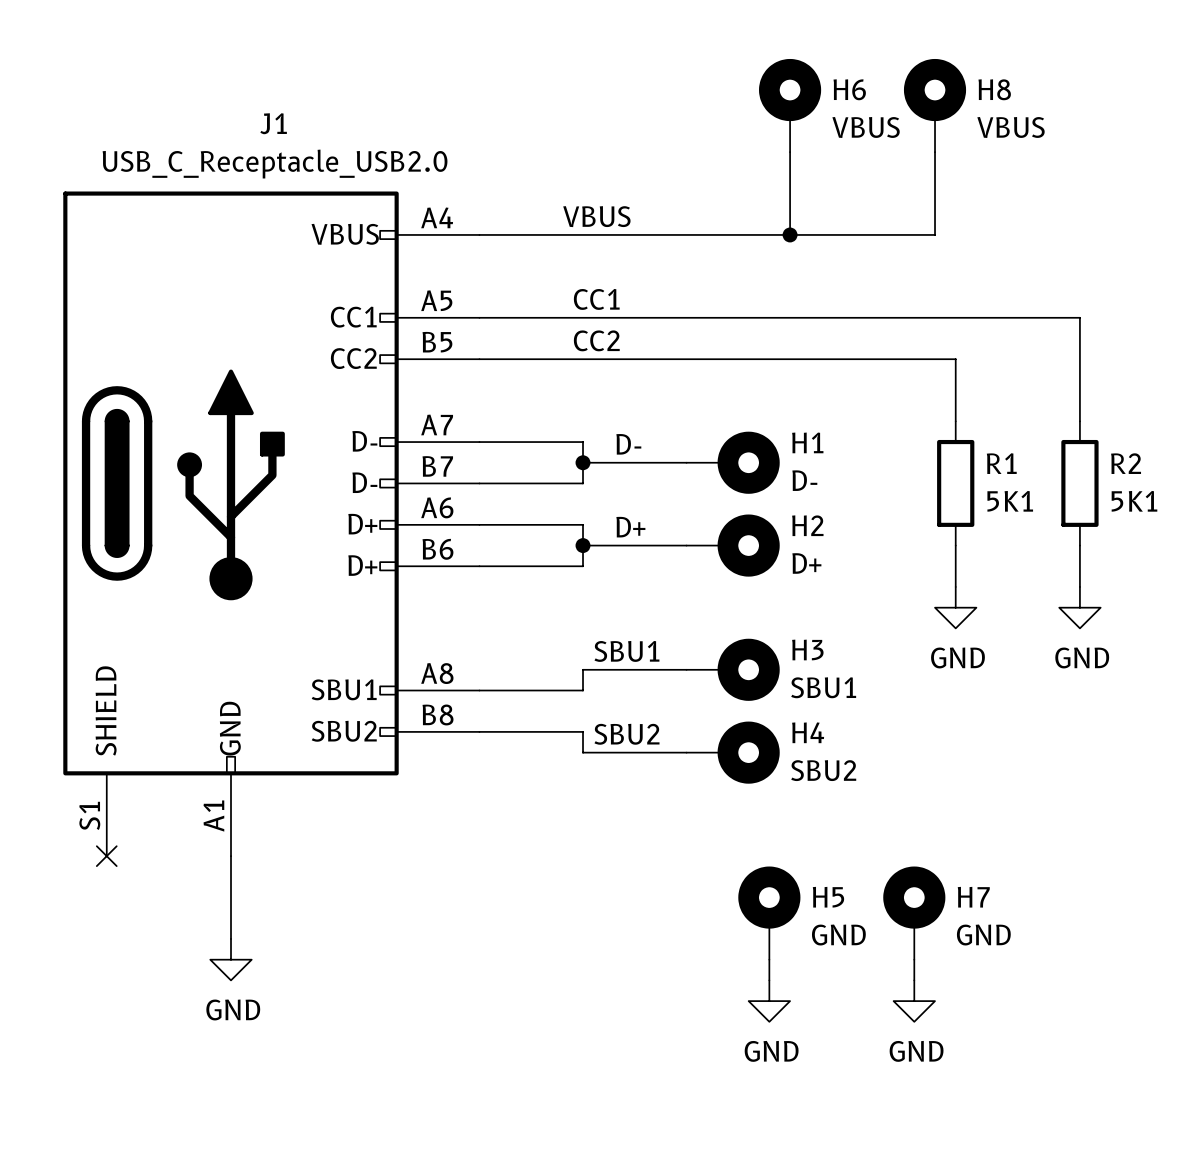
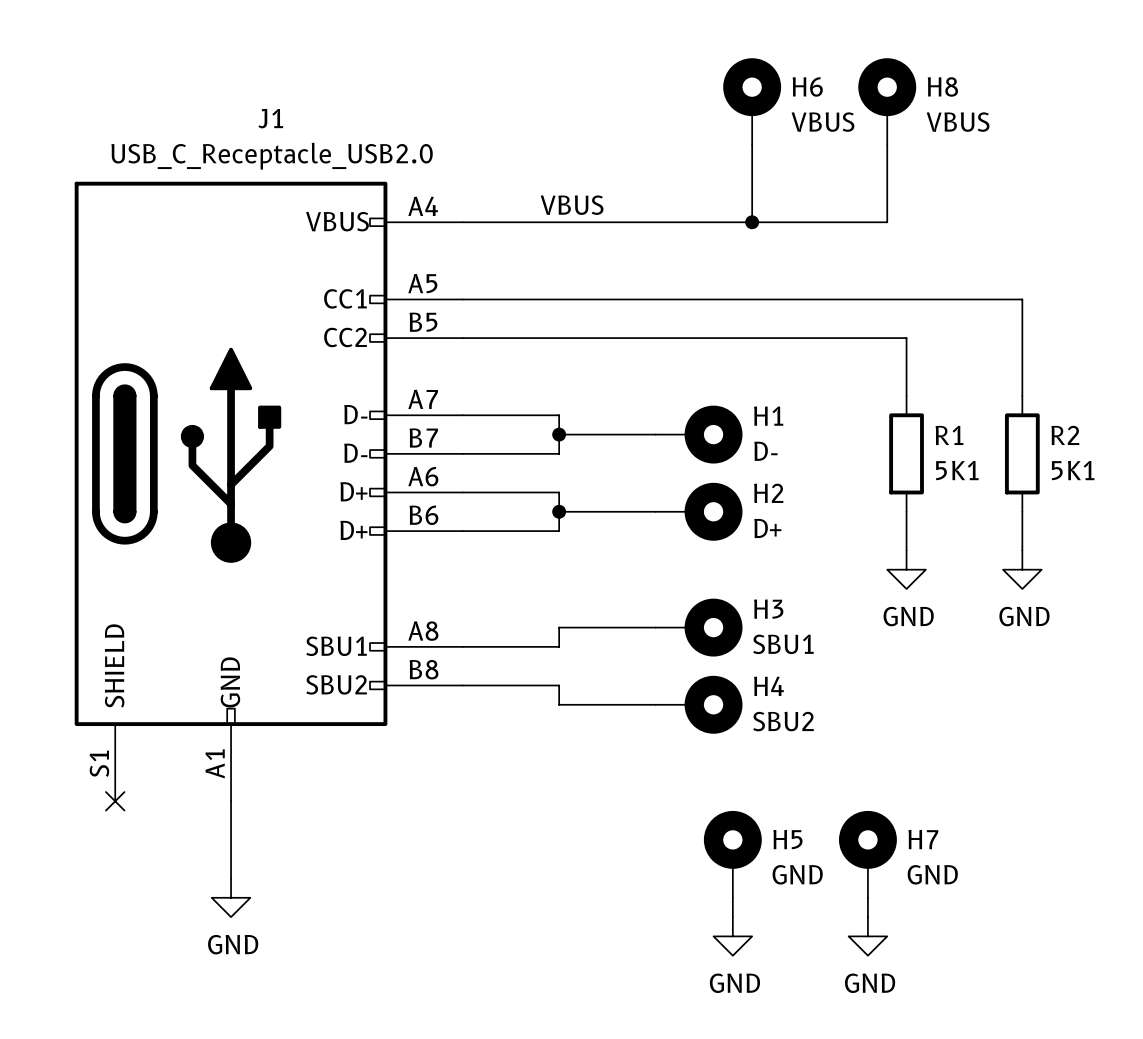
label: CC1 (596, 299) -> none
label: CC2 (596, 340) -> none
label: D- (628, 444) -> none
label: D+ (630, 527) -> none
label: SBU1 (626, 651) -> none
label: SBU2 (626, 734) -> none

